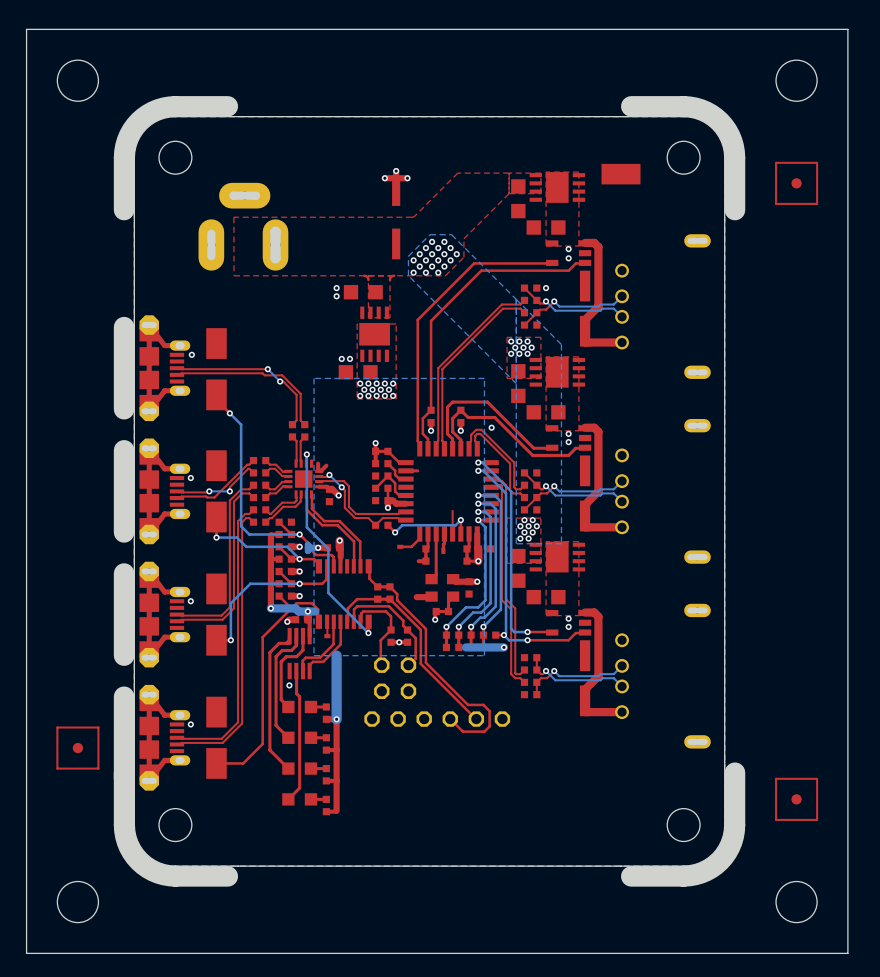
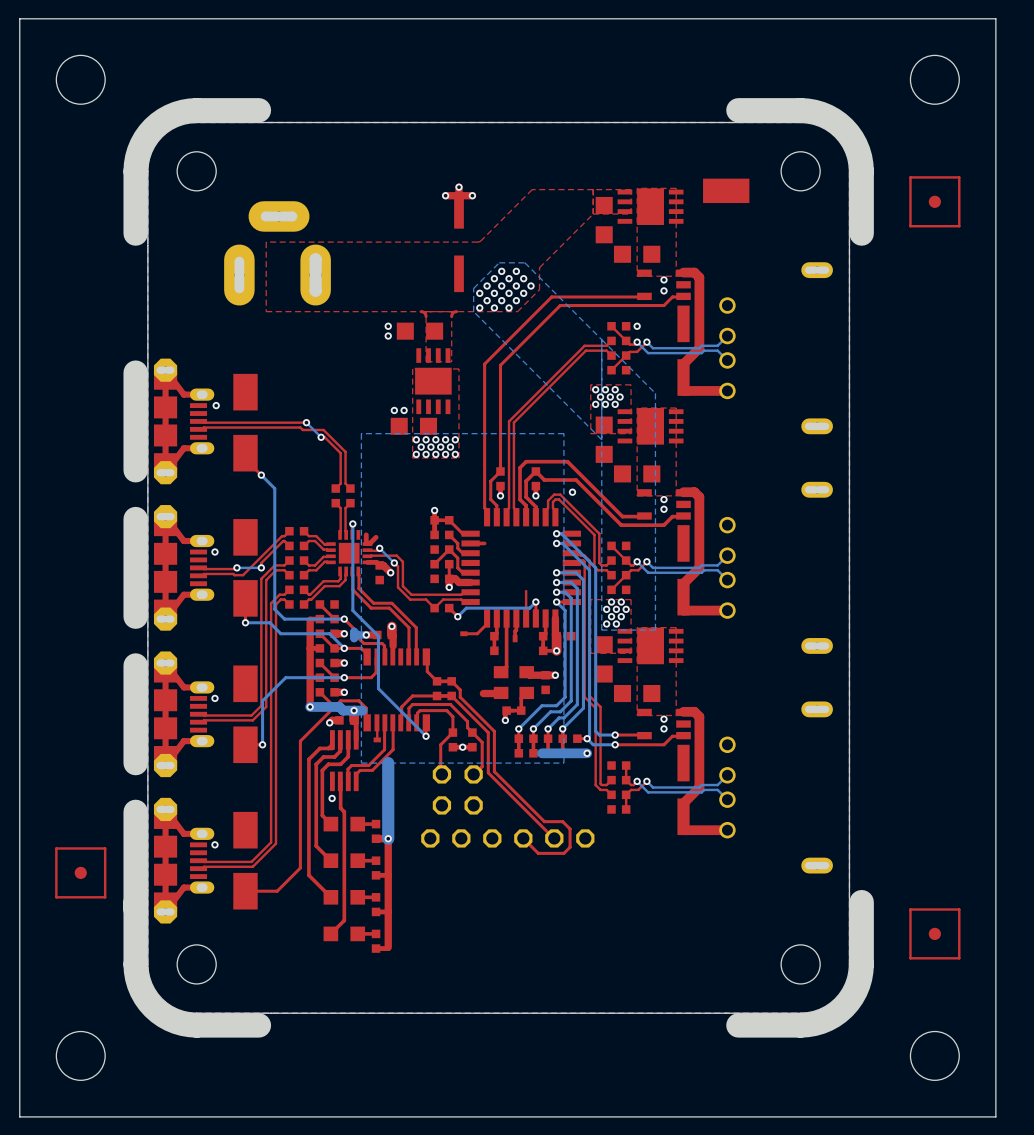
top track: (425, 555) (425, 561) (418, 561) -> none

